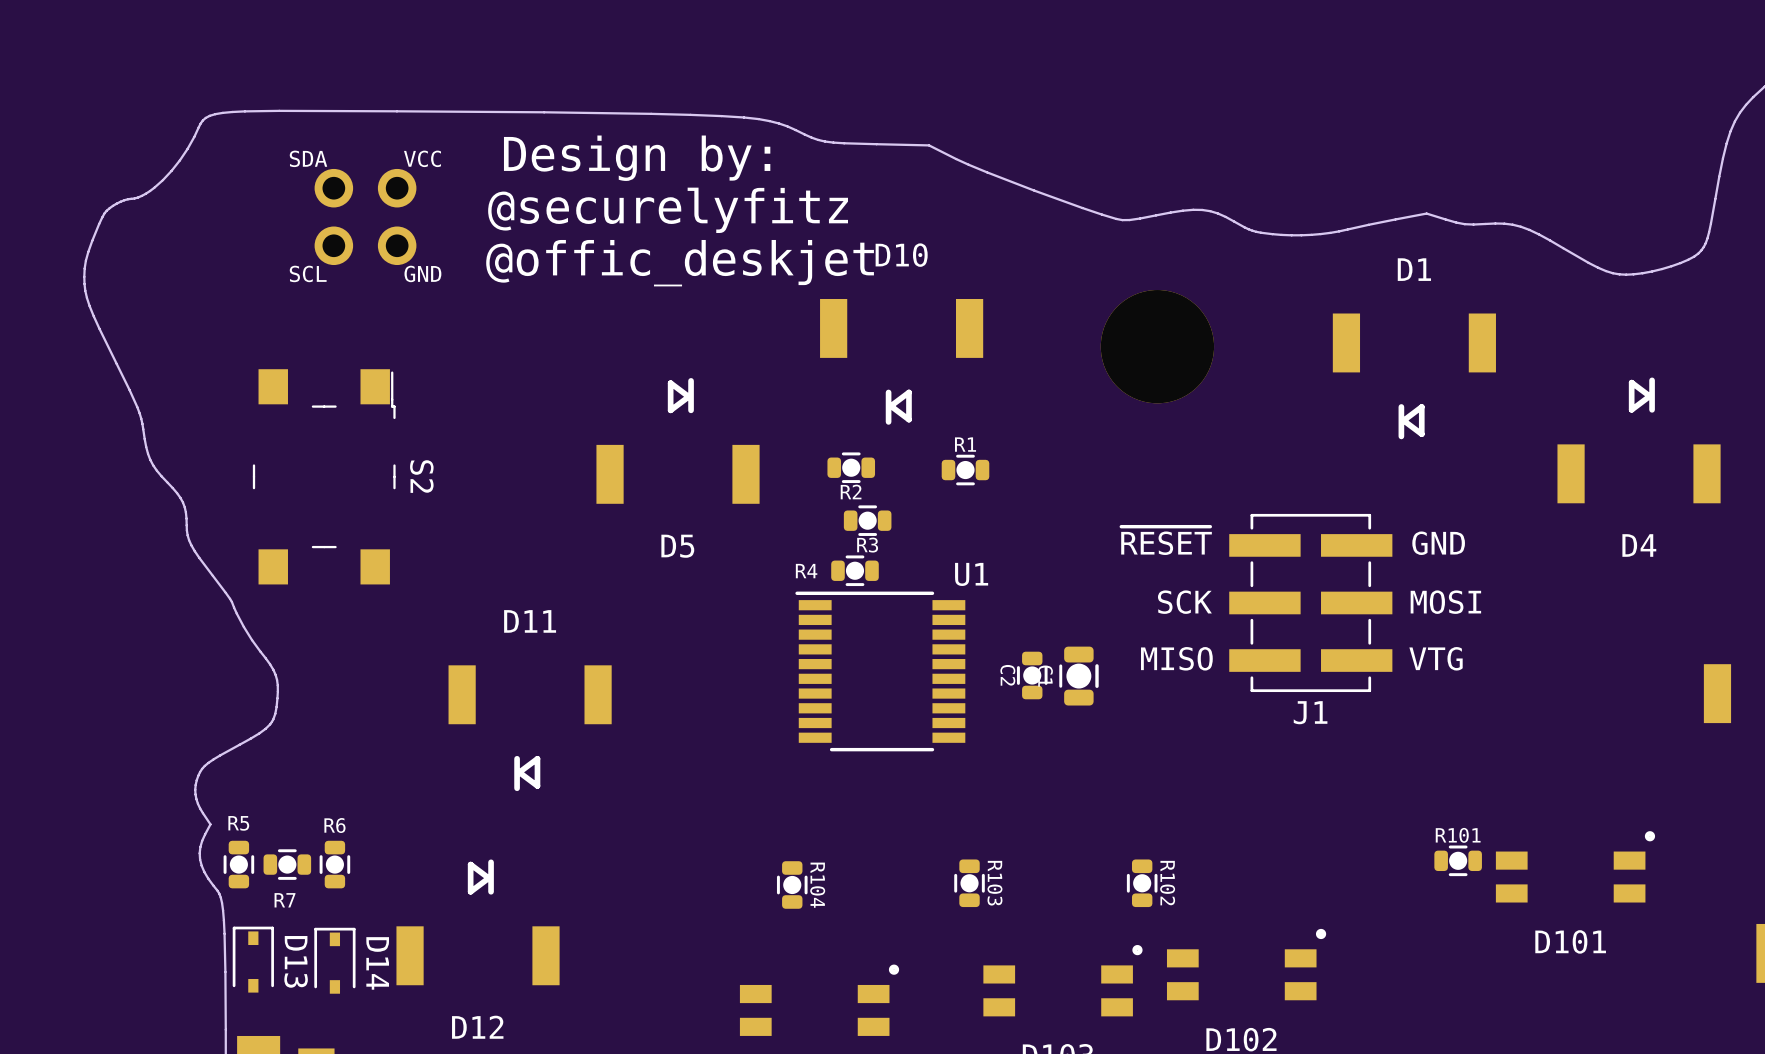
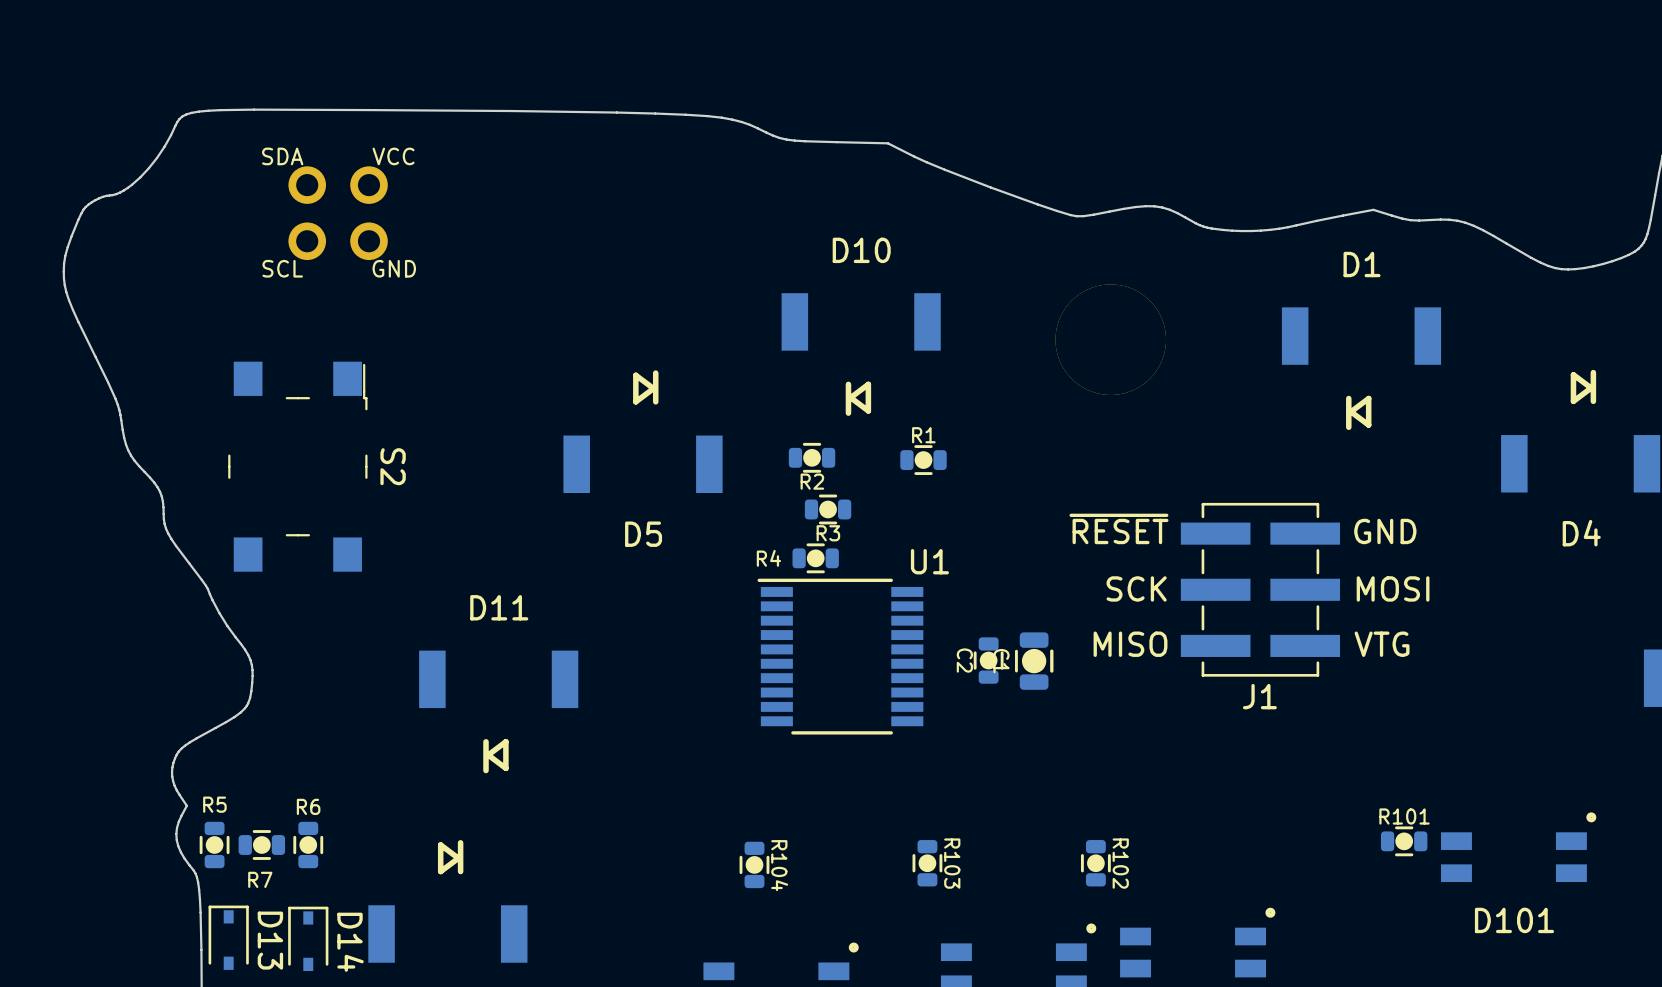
text: Design by: (637, 158) -> none
text: @securelyfitz (668, 210) -> none
text: @offic_deskjet (680, 263) -> none

